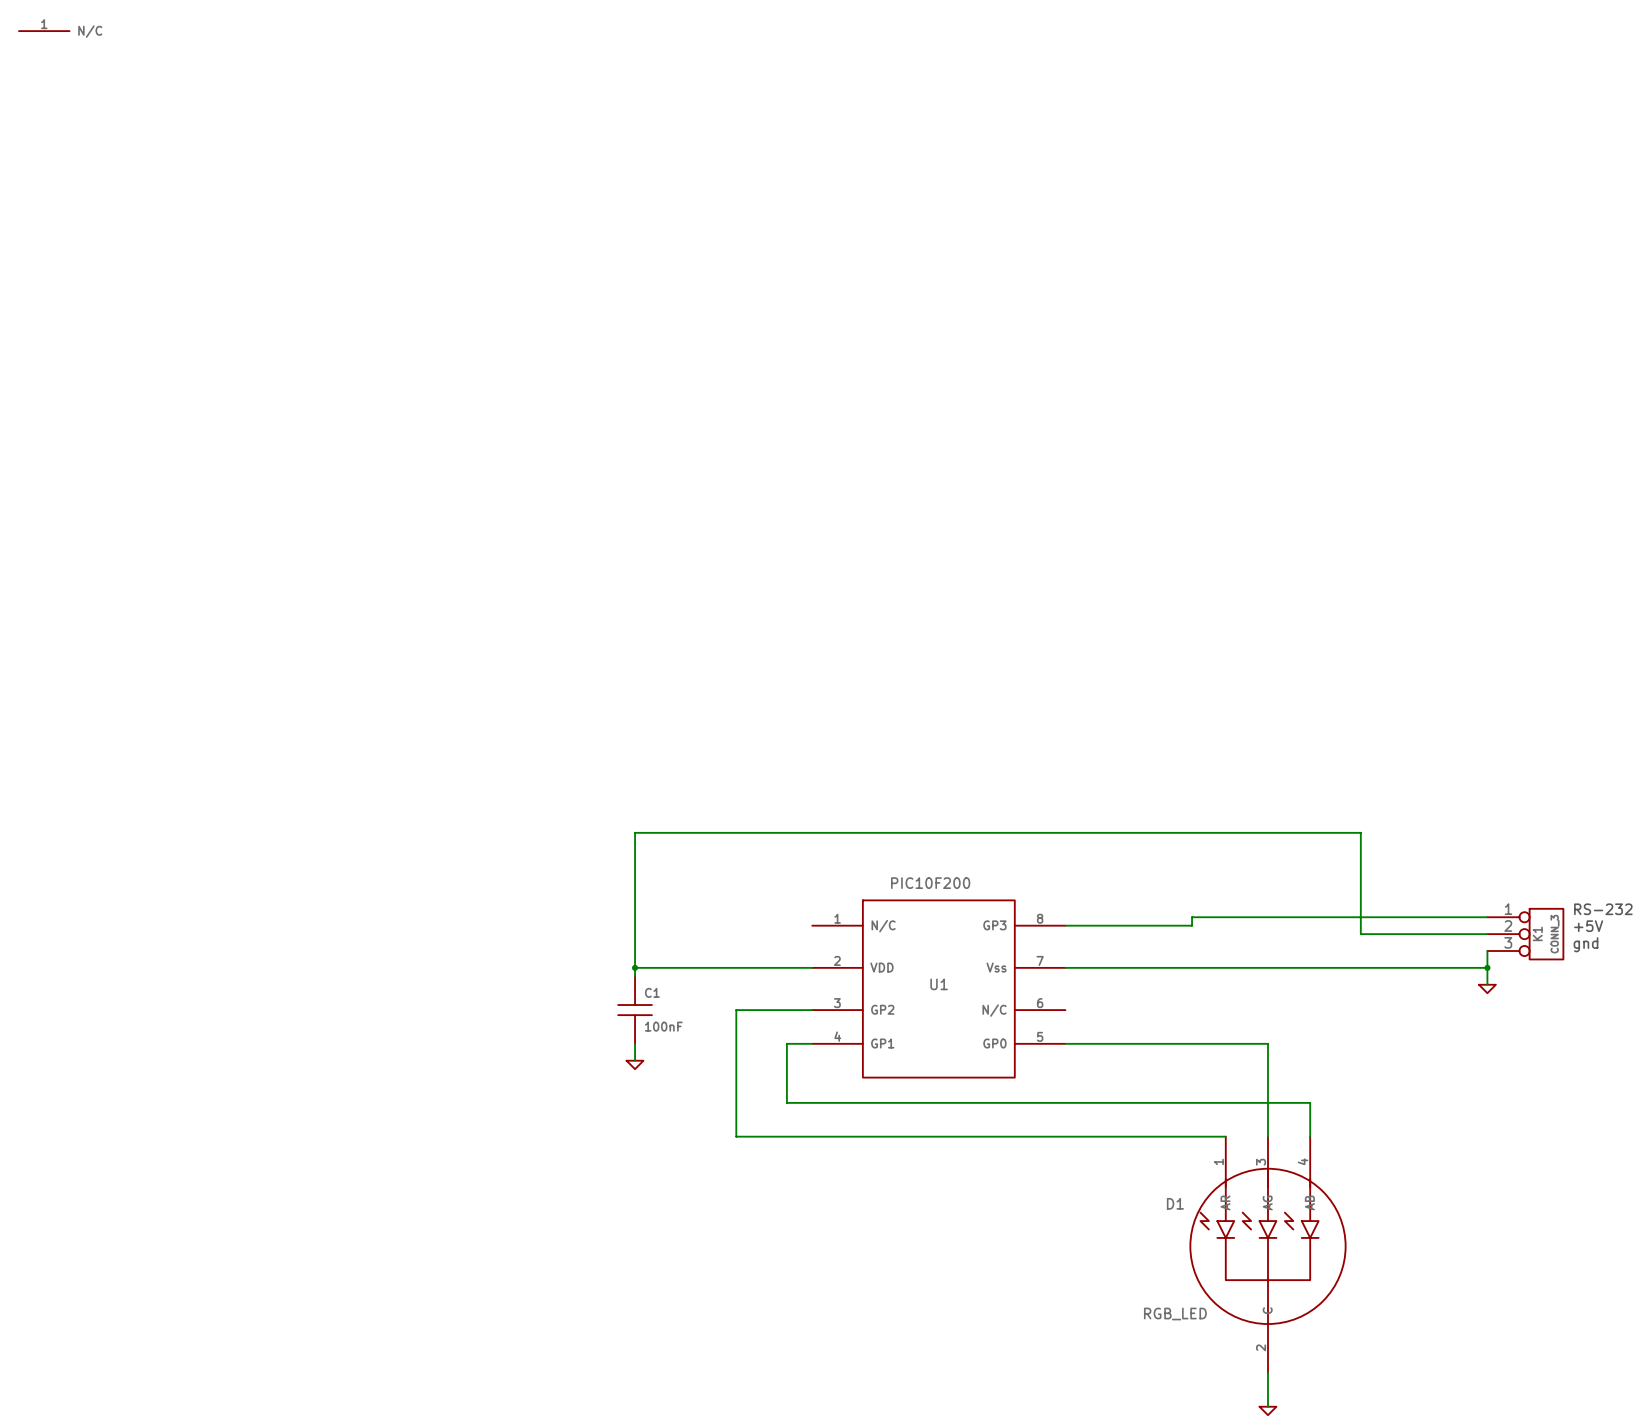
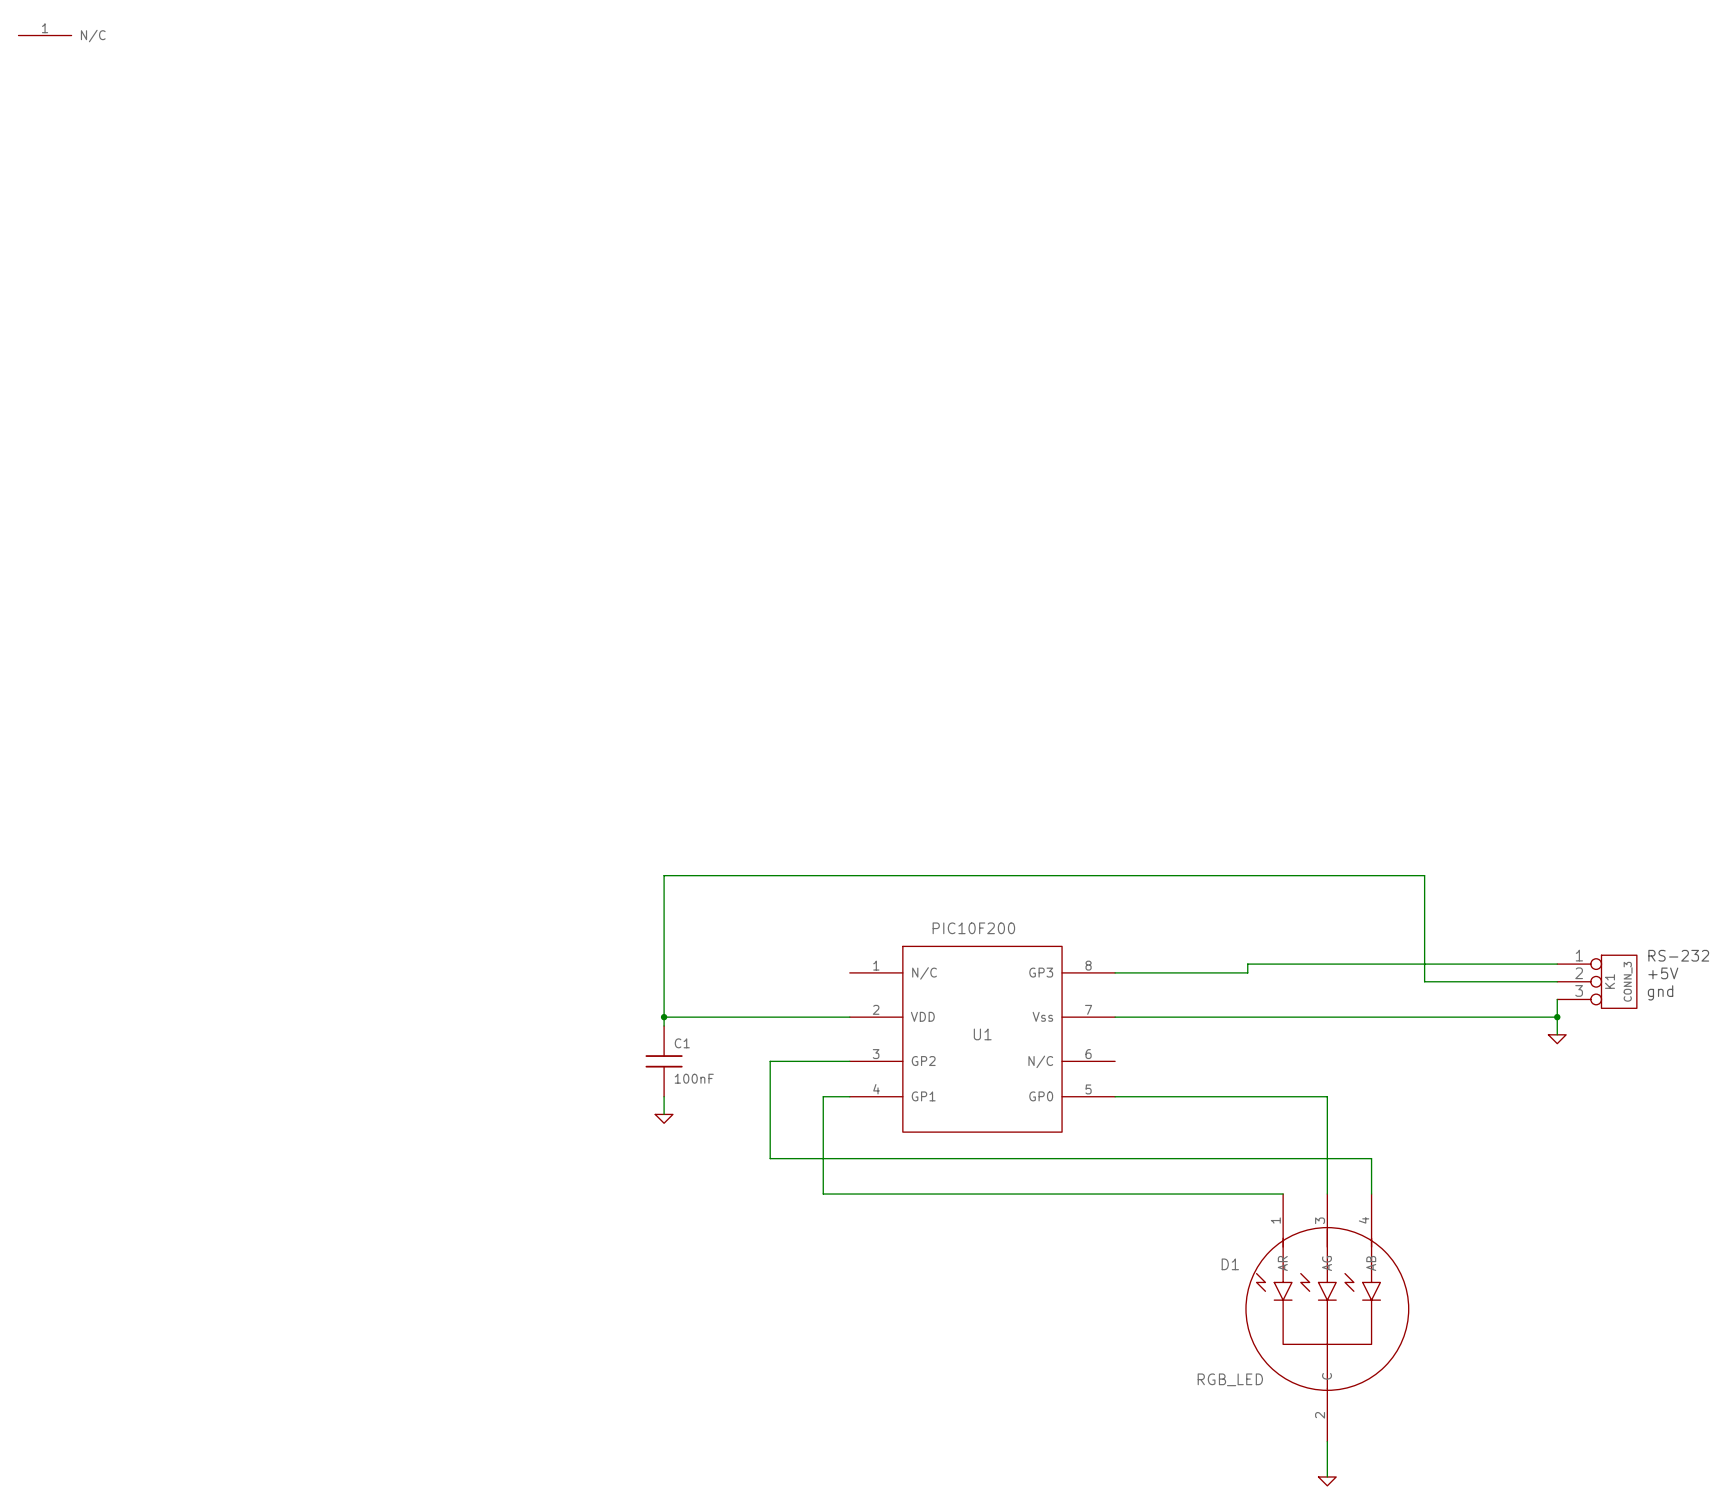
wire: (736, 1102) (736, 1136) (786, 1136) -> (770, 1158) (823, 1158) (823, 1194)

